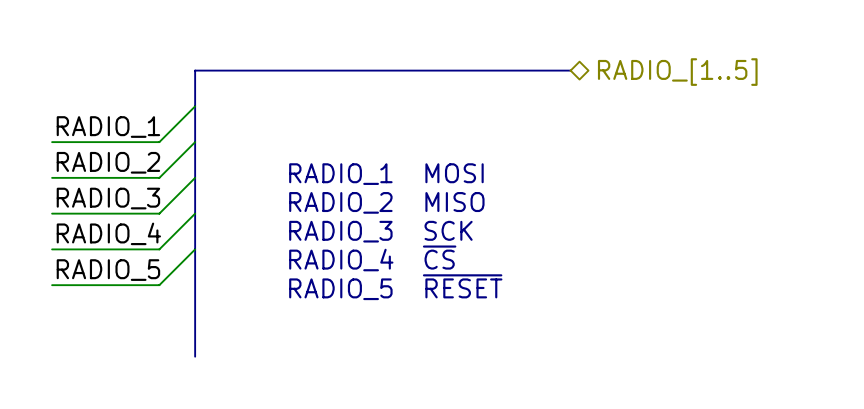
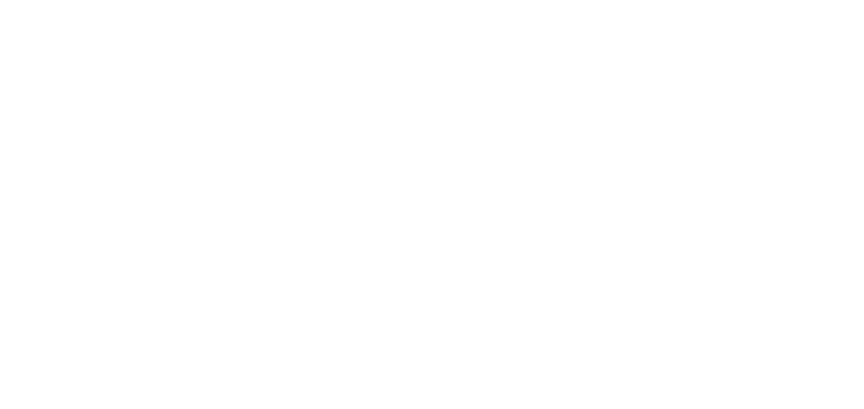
bus: (570, 70) (195, 70) (195, 356) -> none
hierarchical label: RADIO_[1..5] (677, 72) -> none
wire: (195, 106) (159, 142) (52, 142) -> none
label: RADIO_1 (108, 127) -> none
wire: (195, 142) (159, 177) (52, 177) -> none
label: RADIO_2 (108, 162) -> none
text: RADIO_1 MOSI (386, 174) -> none
wire: (195, 177) (159, 213) (52, 213) -> none
label: RADIO_3 (108, 198) -> none
text: RADIO_2 MISO (386, 202) -> none
wire: (195, 213) (159, 249) (52, 249) -> none
text: RADIO_3 SCK (380, 231) -> none
label: RADIO_4 (108, 233) -> none
wire: (195, 249) (159, 285) (52, 285) -> none
text: RADIO_4 ~{CS} (372, 258) -> none
label: RADIO_5 (108, 270) -> none
text: RADIO_5 ~{RESET} (395, 287) -> none

